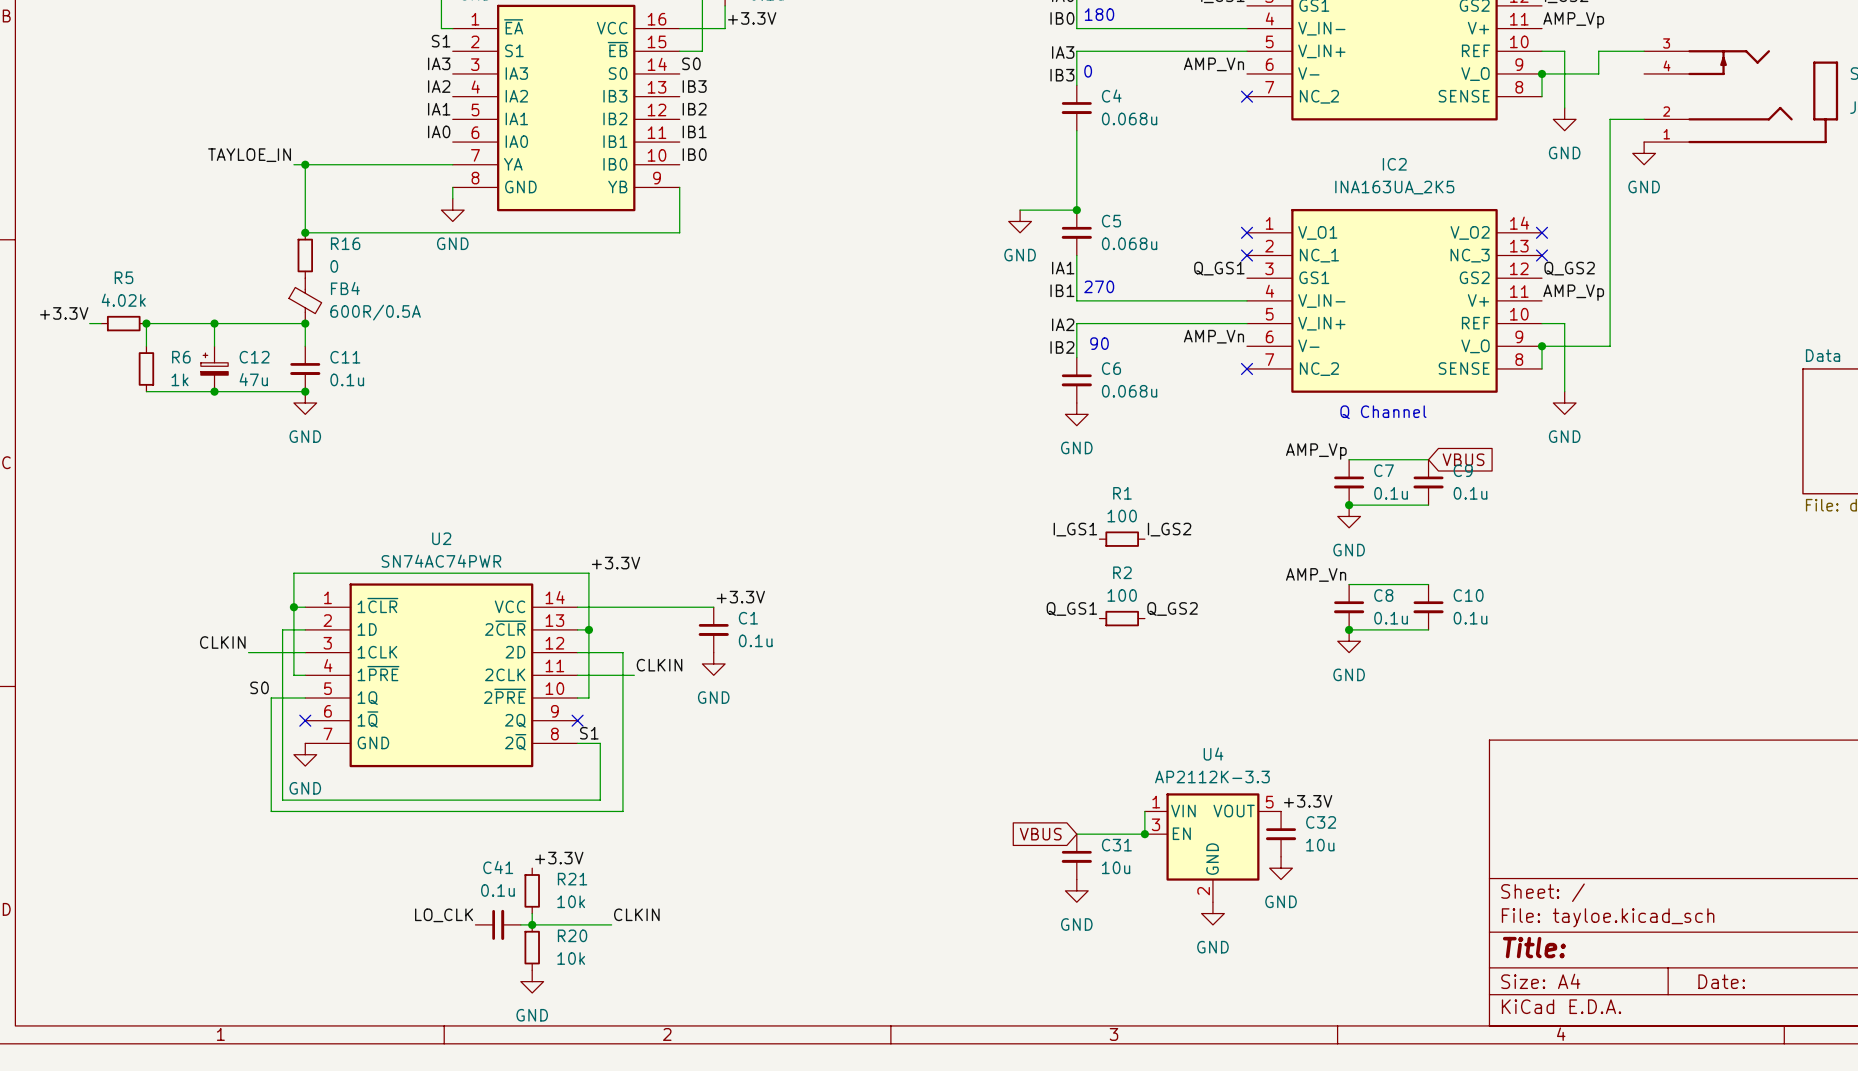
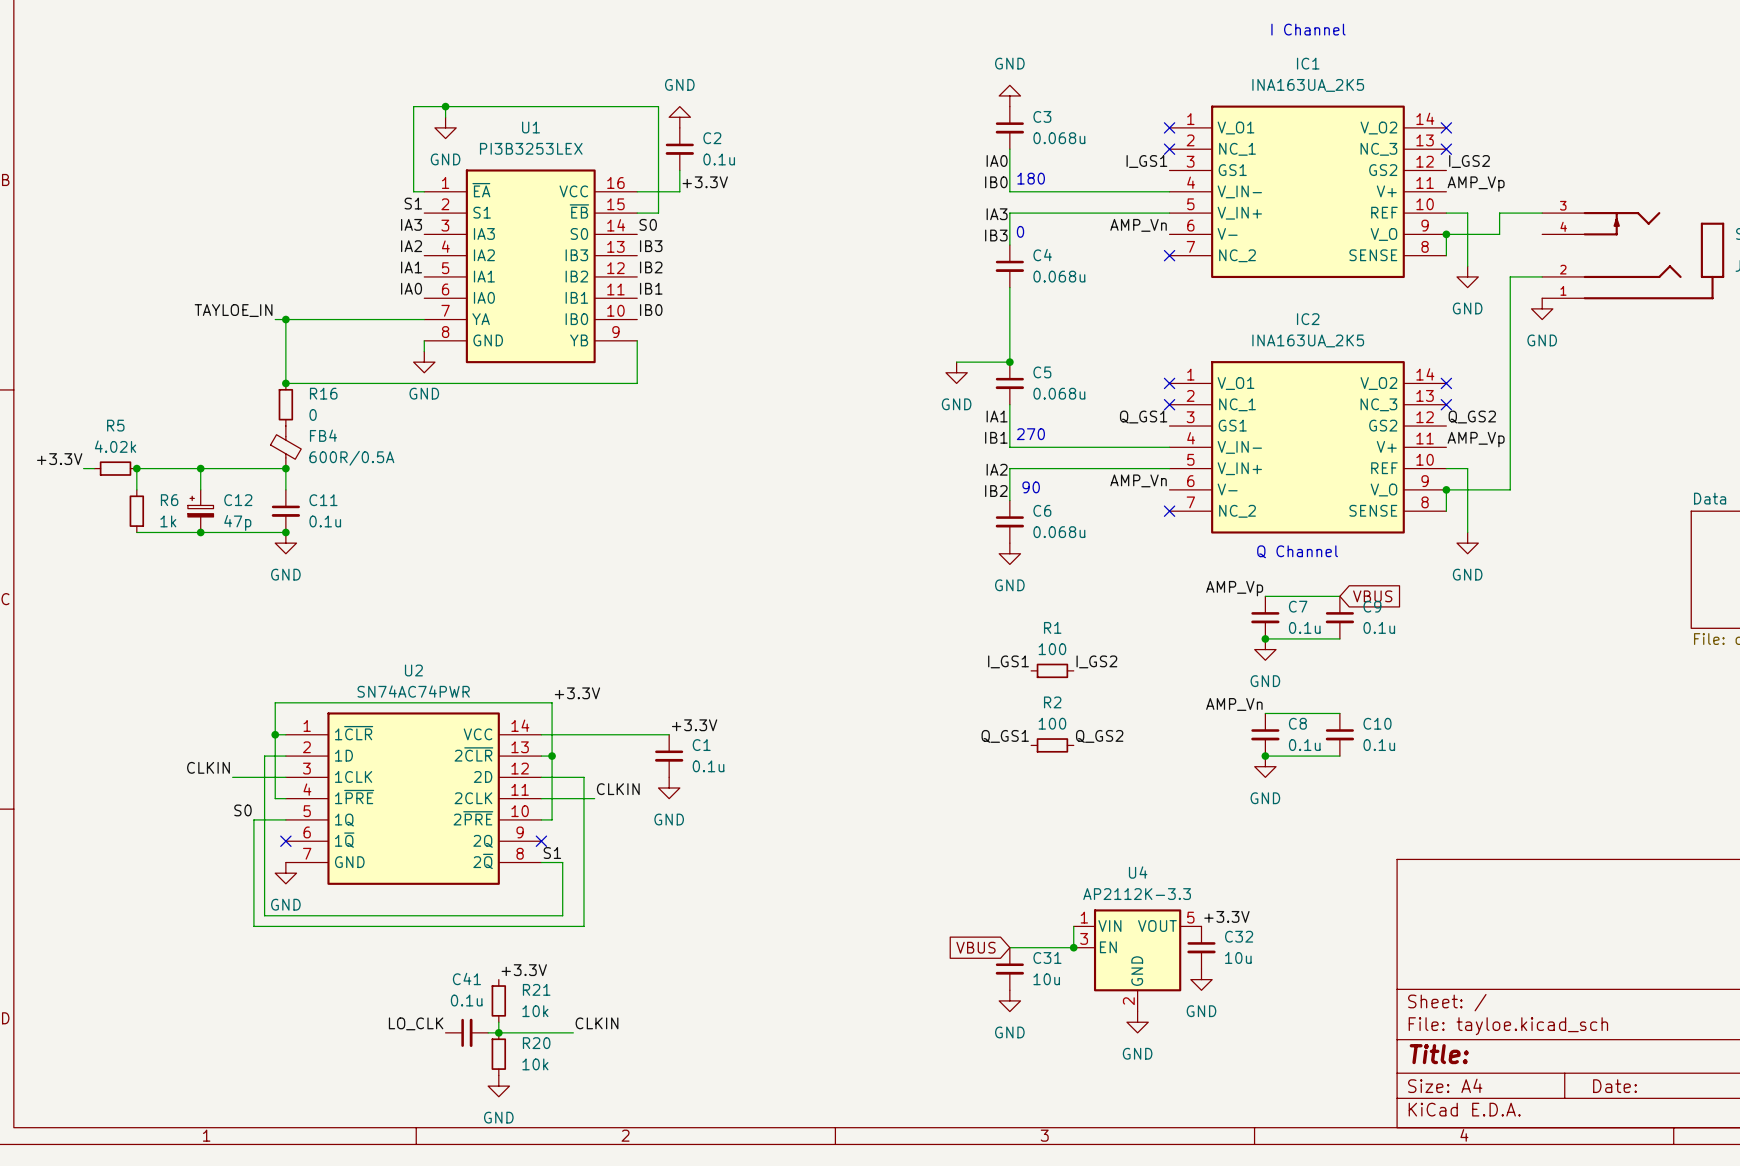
C12 value: 47u (253, 379) -> 47p (237, 522)

